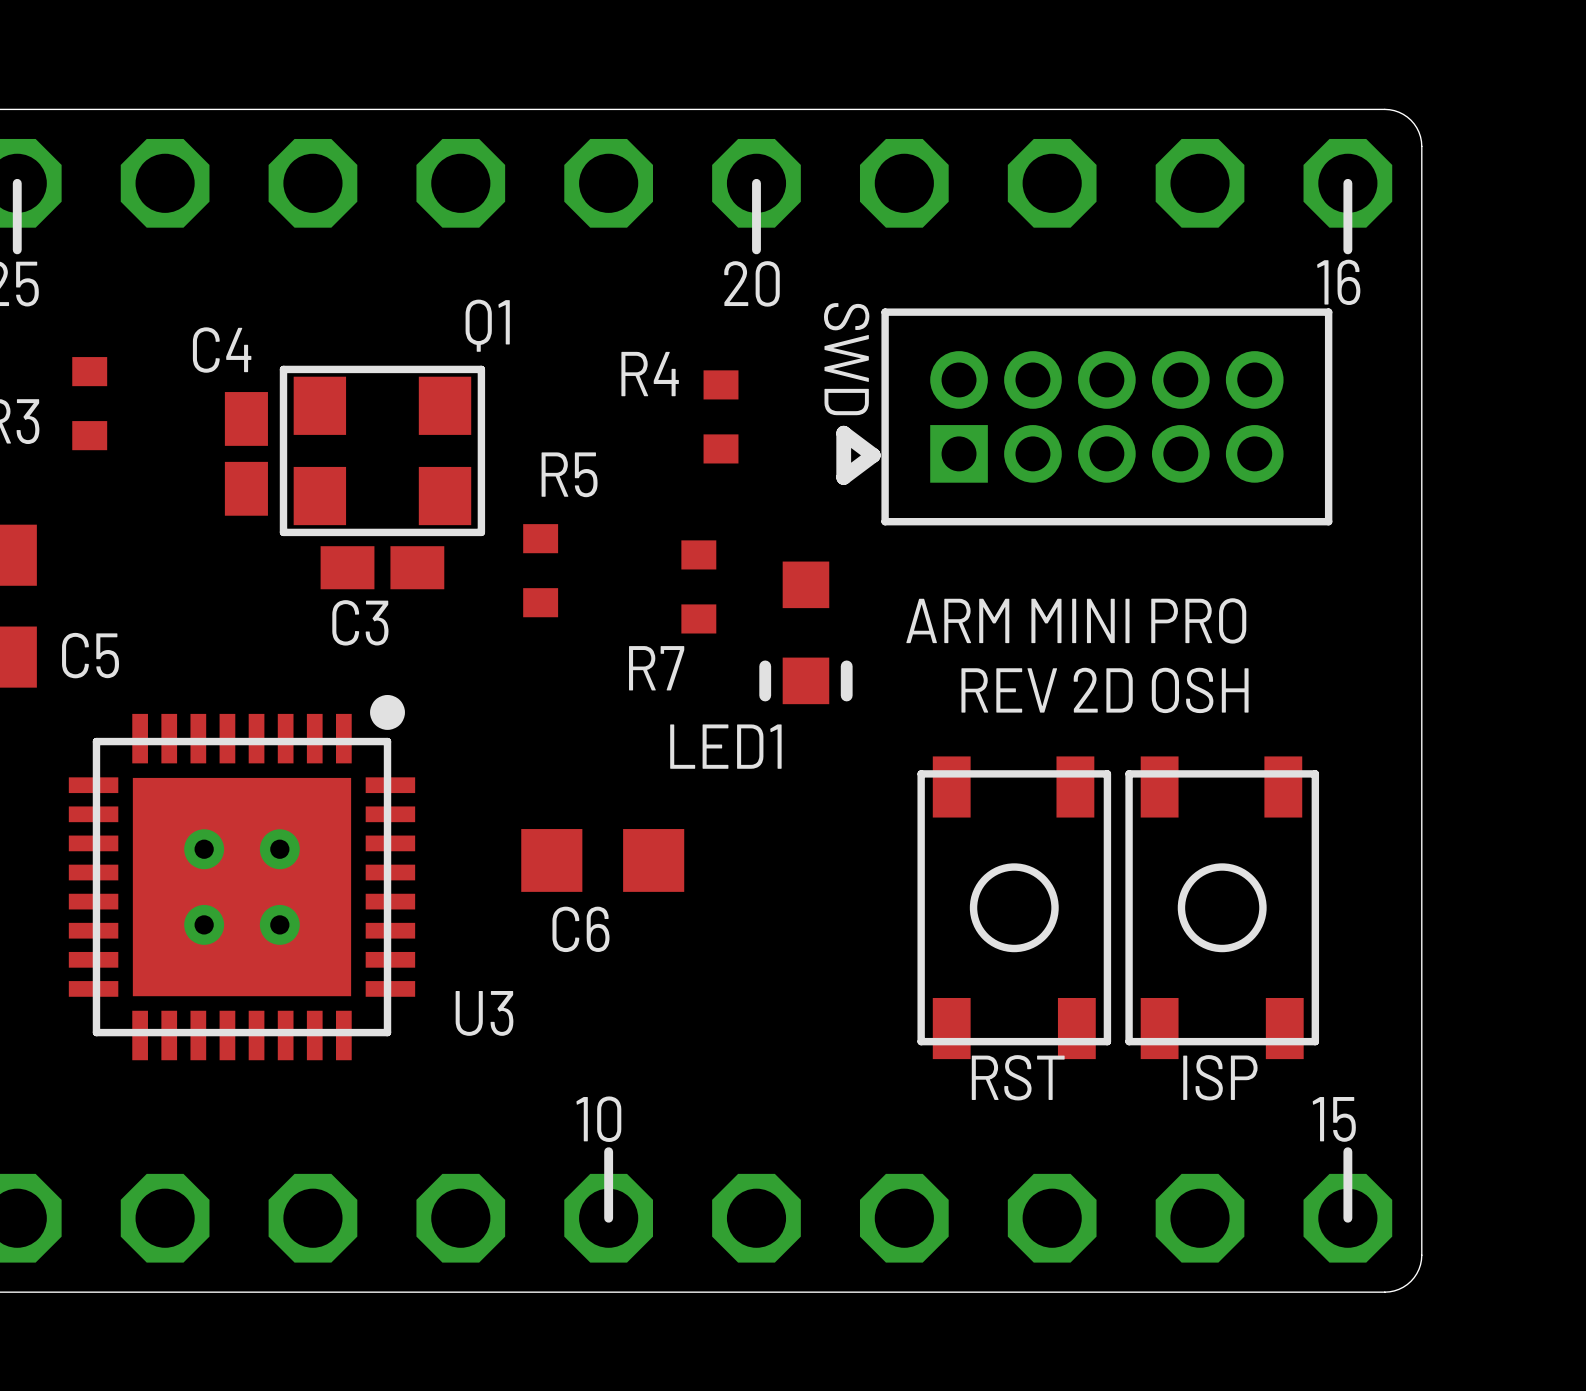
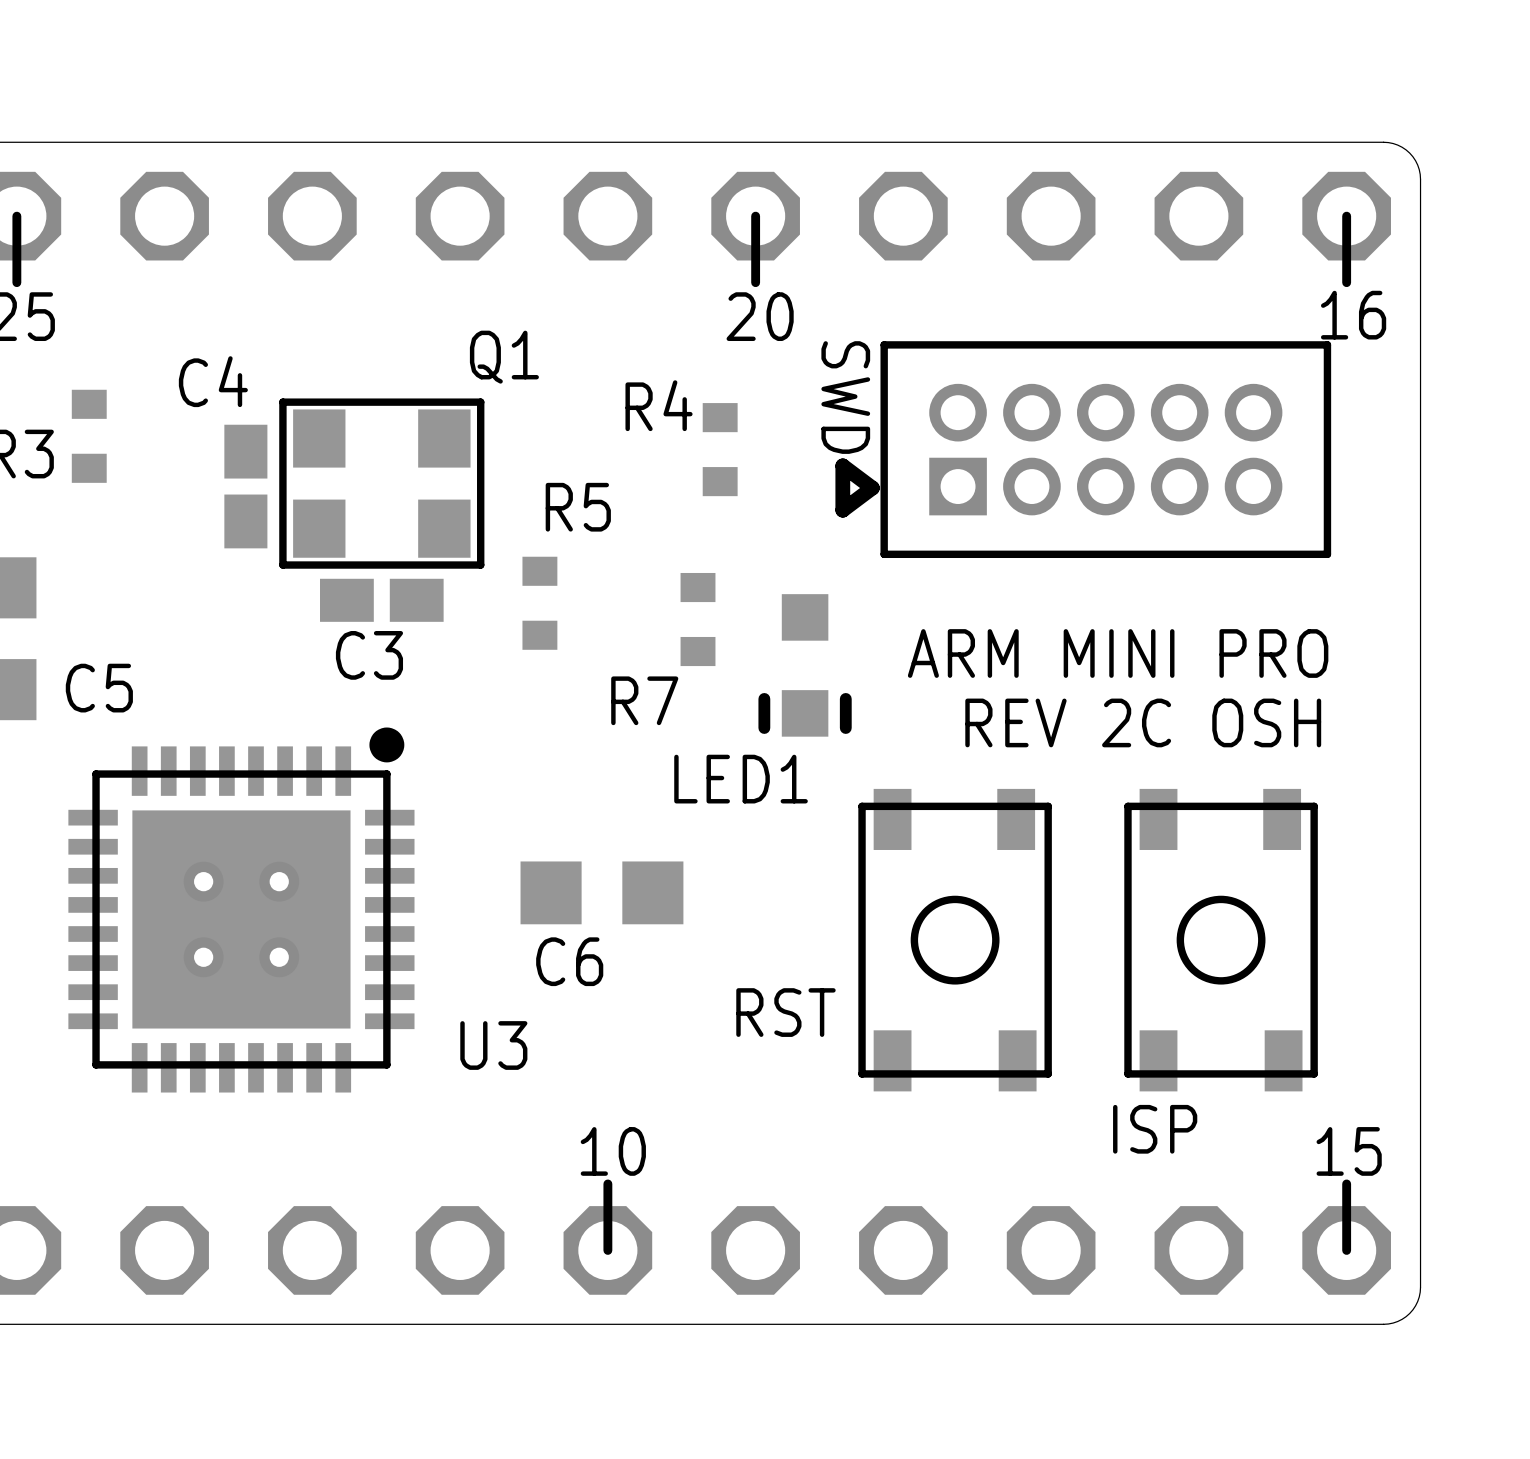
text: REV 2D OSH (1105, 690) -> REV 2C OSH (1143, 722)
part position: (1014, 907) -> (955, 940)
text position: RST (1018, 1077) -> RST (785, 1012)
text position: ISP (1220, 1077) -> ISP (1155, 1129)

